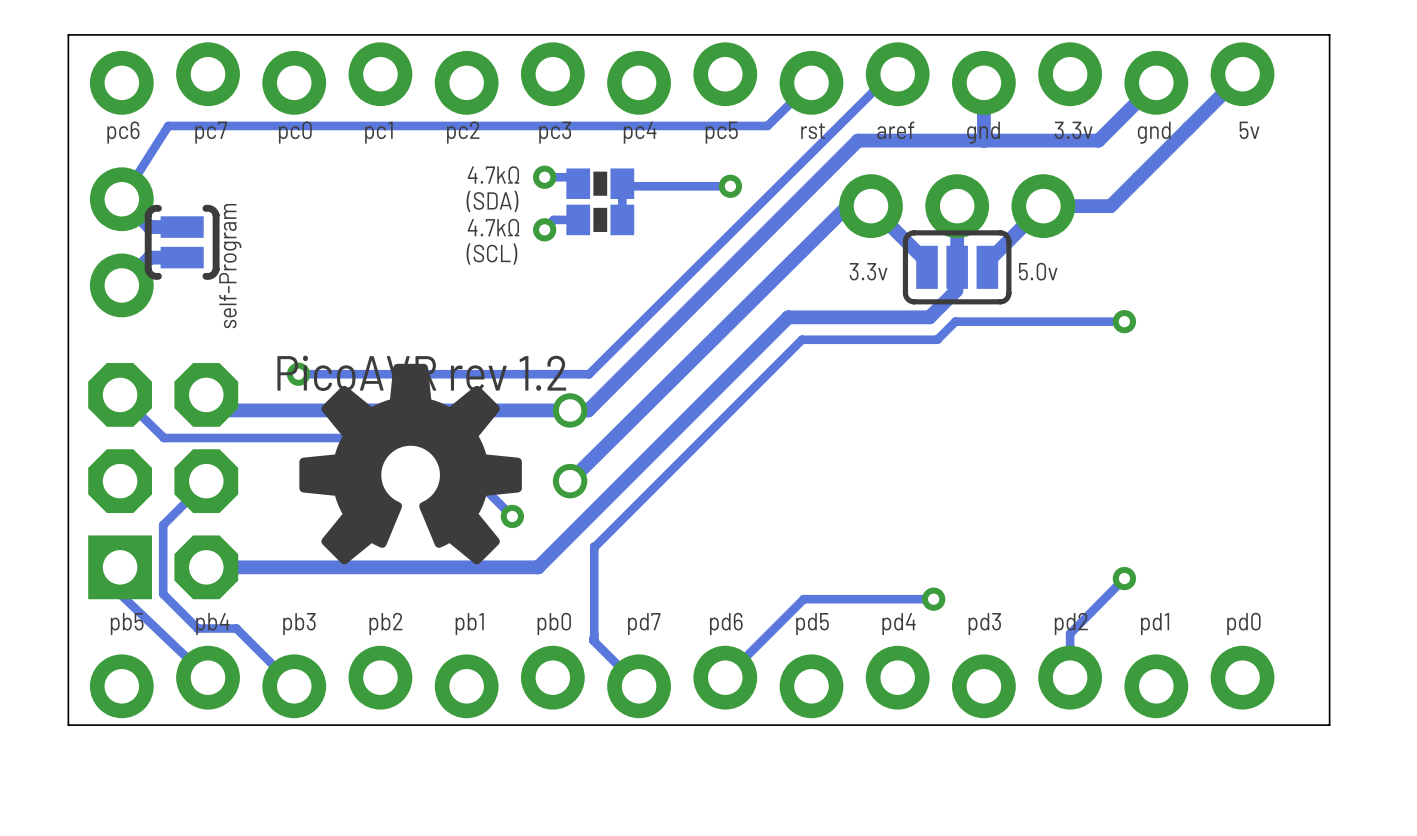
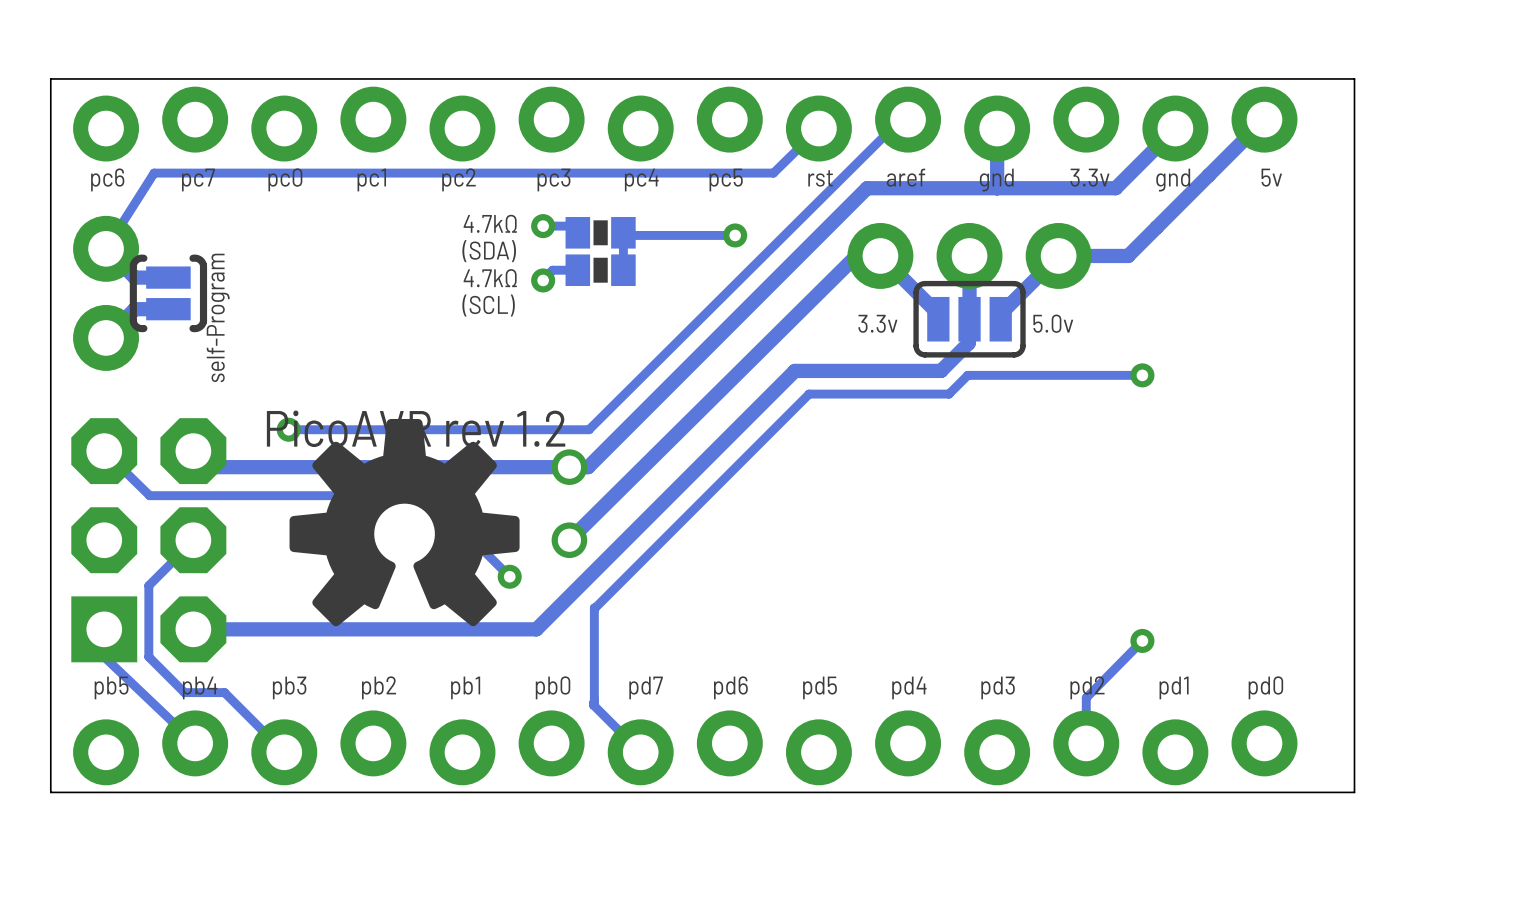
track: (933, 599) (803, 599) (725, 677) -> none
via: (933, 599) -> none

